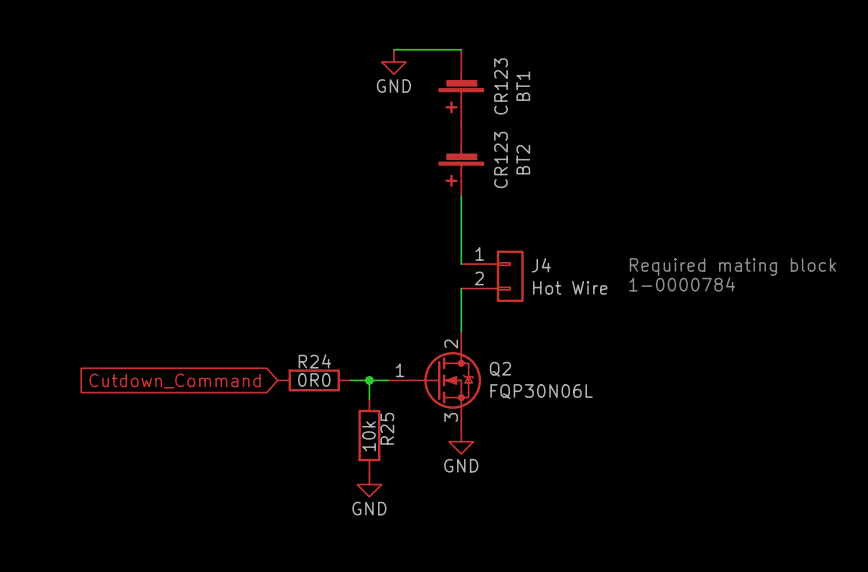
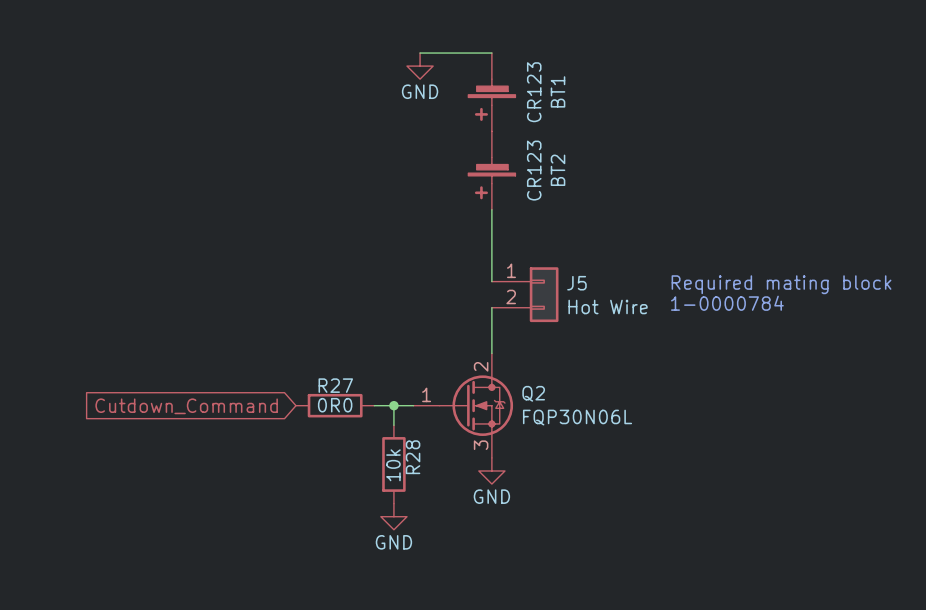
J4 name: J4 (541, 265) -> J5 (576, 283)
R24 name: R24 (314, 361) -> R27 (335, 385)
R25 name: R25 (387, 428) -> R28 (413, 457)

